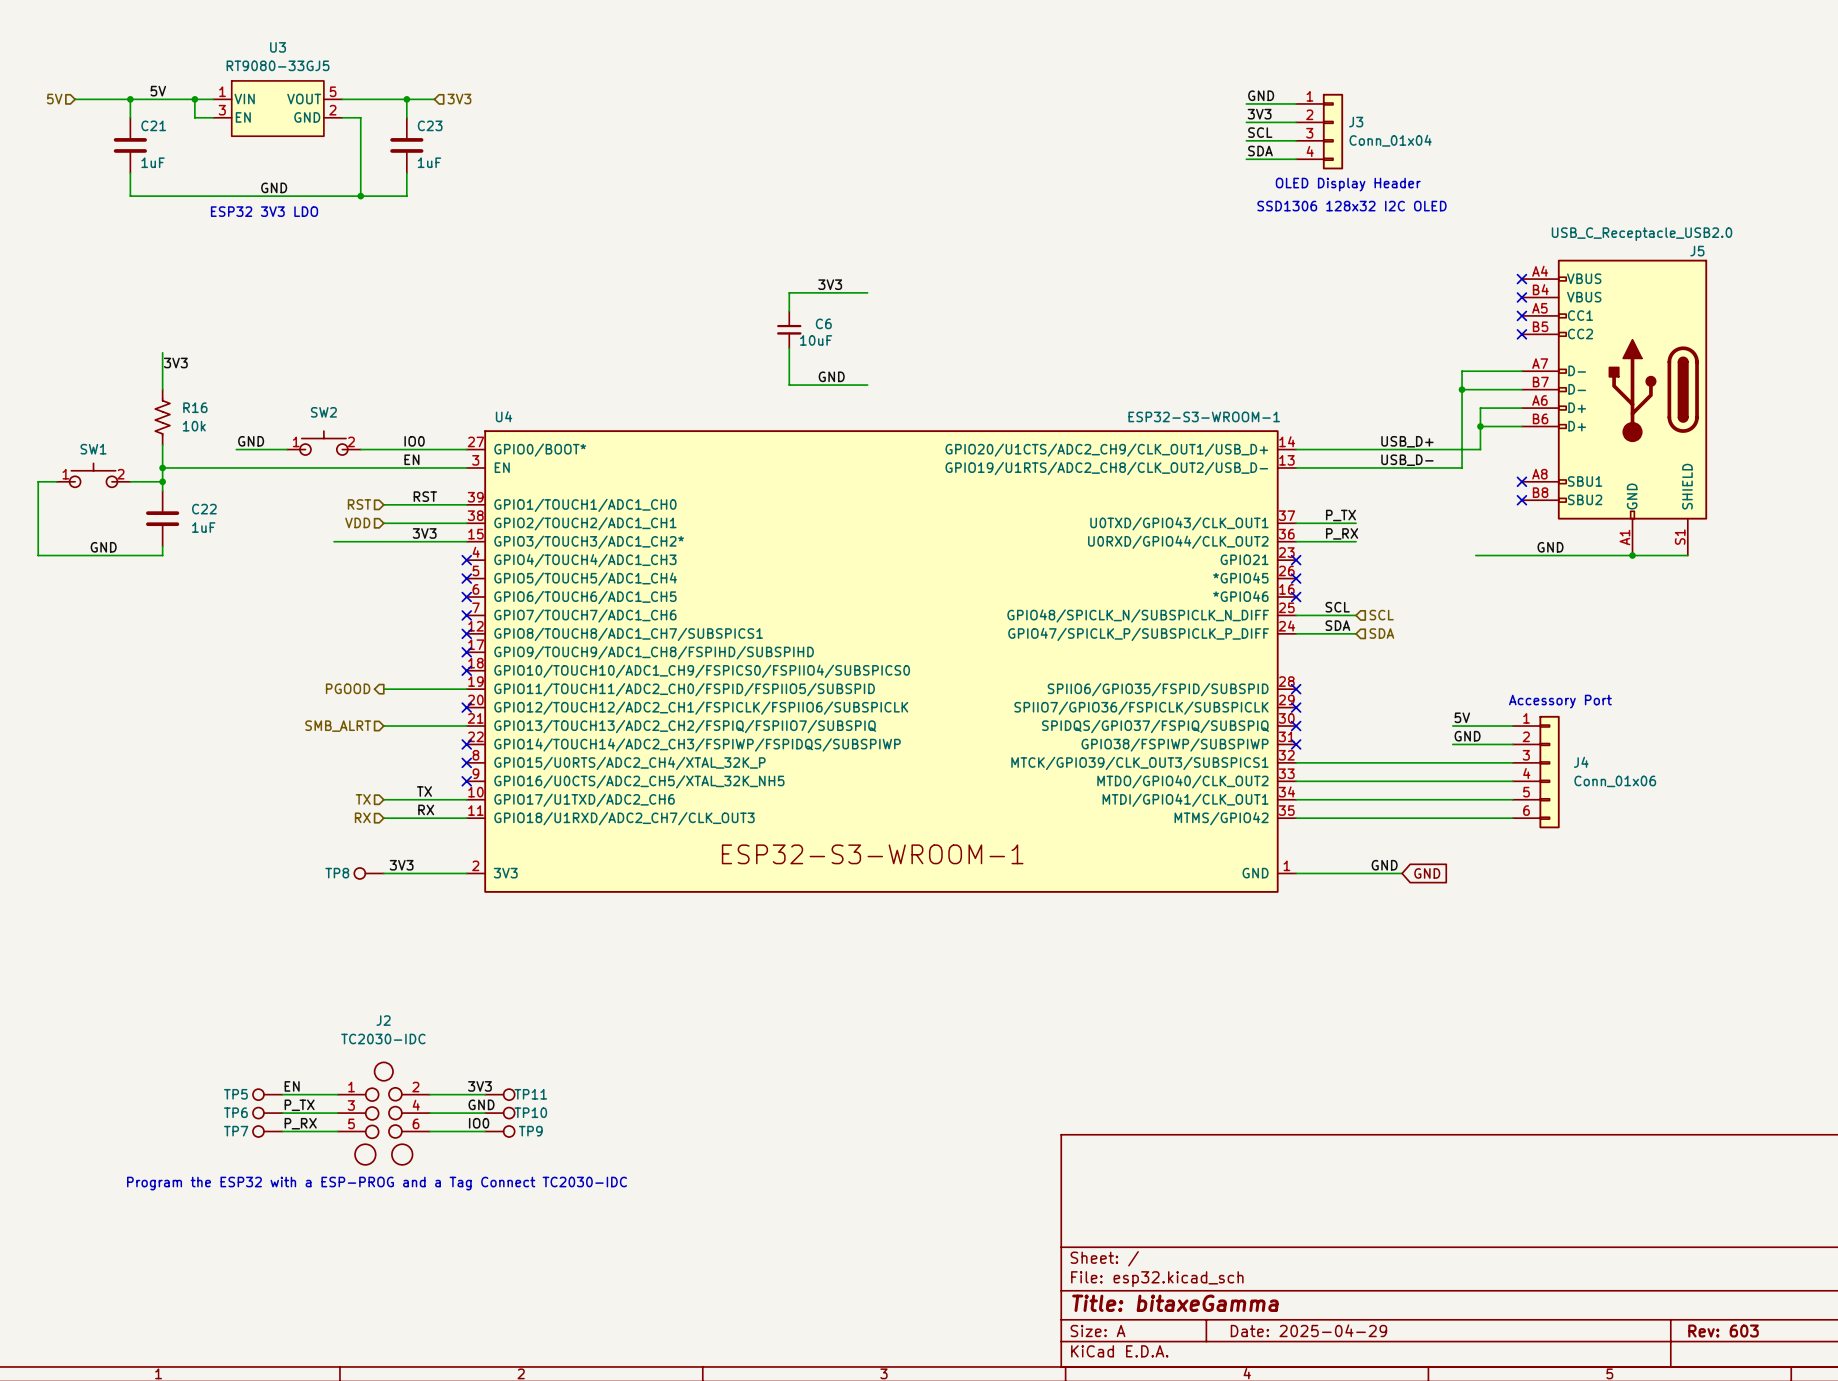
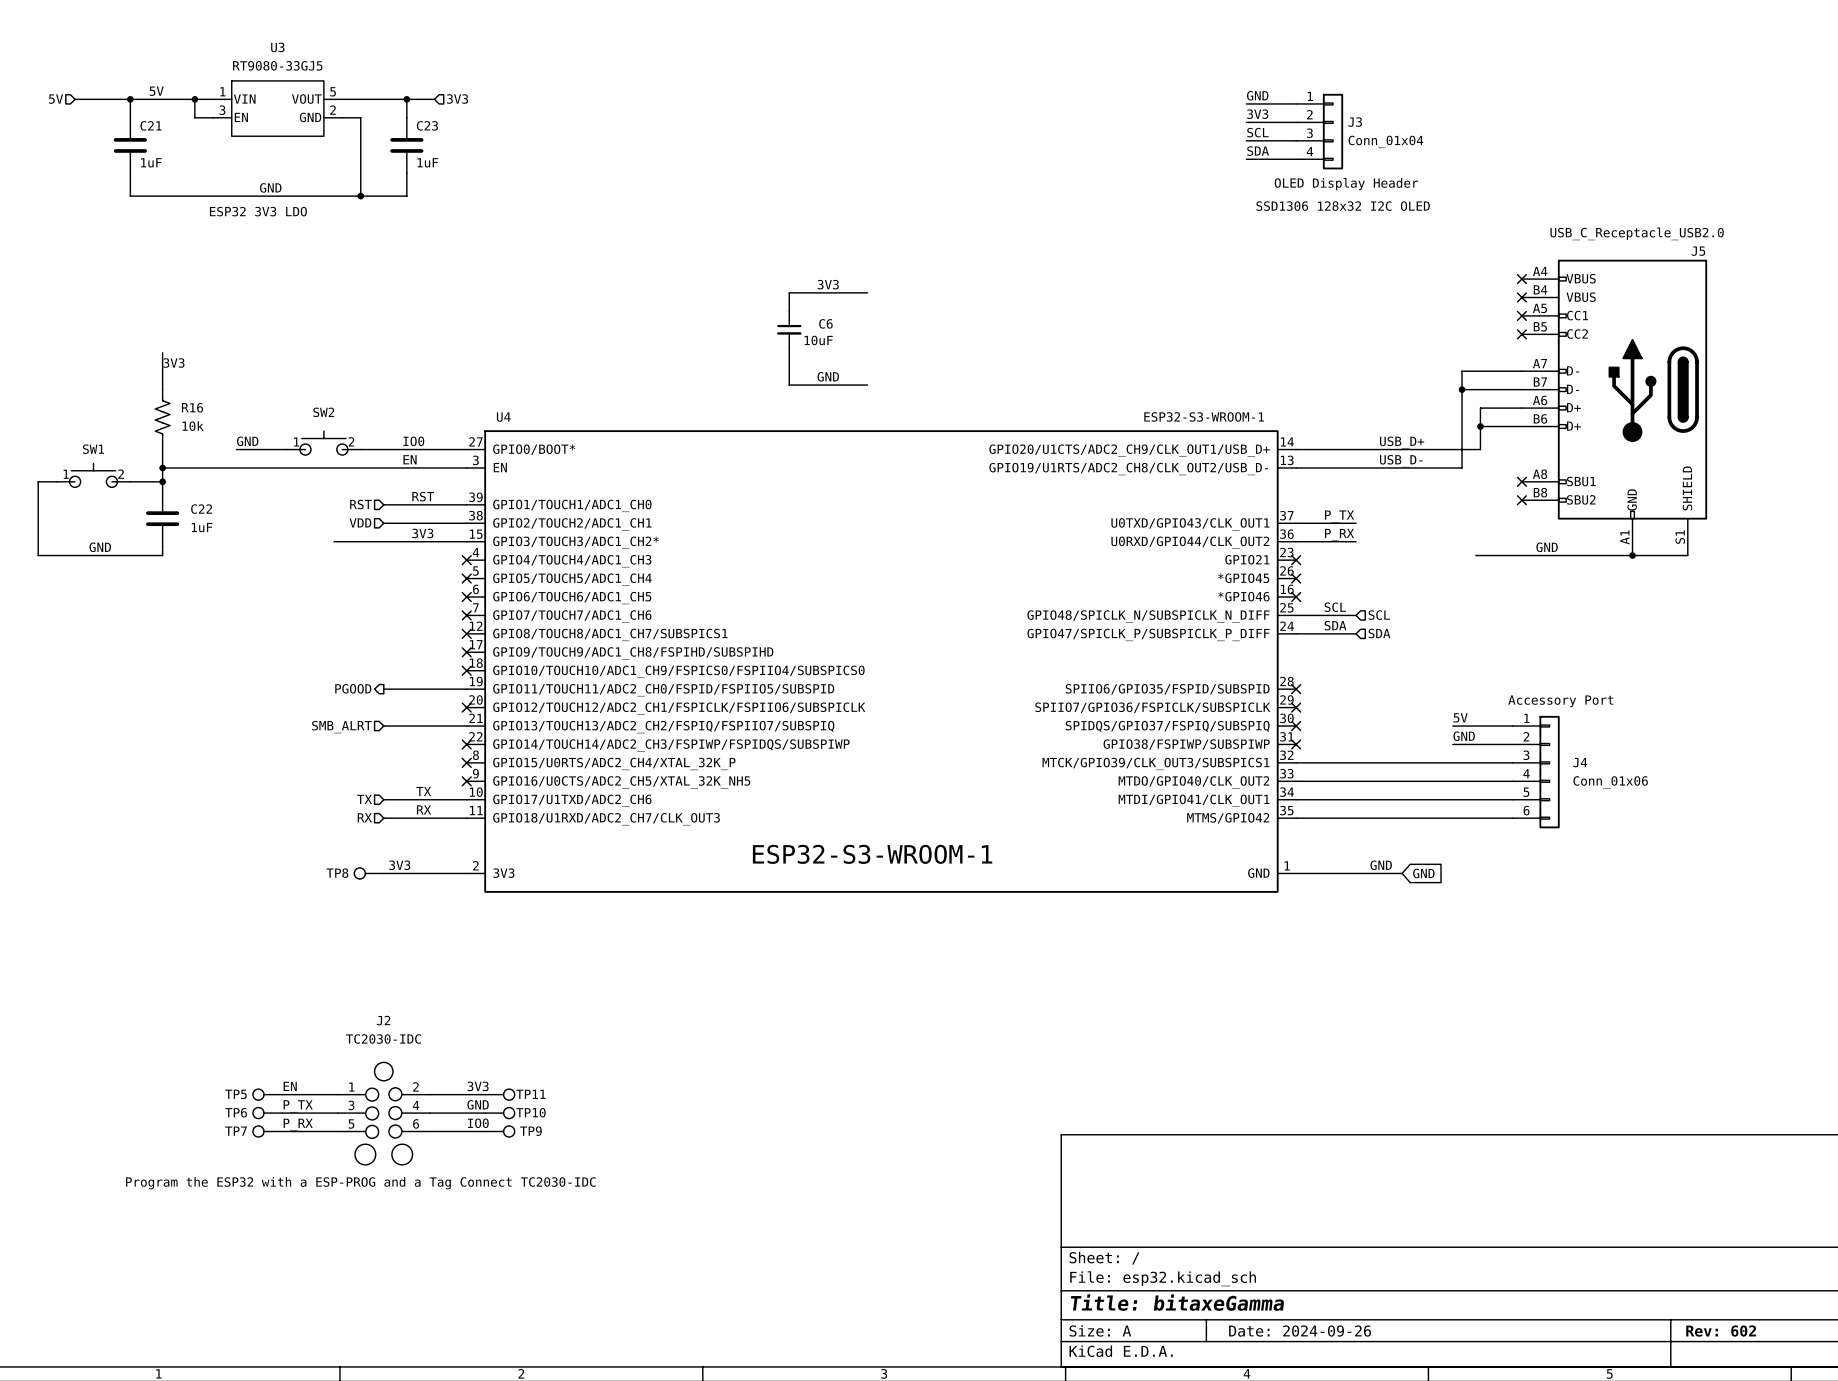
title block: Date: 2025-04-29 (1308, 1330) -> Date: 2024-09-26 (1300, 1331)
title block: Rev: 603 (1723, 1331) -> Rev: 602 (1721, 1331)

